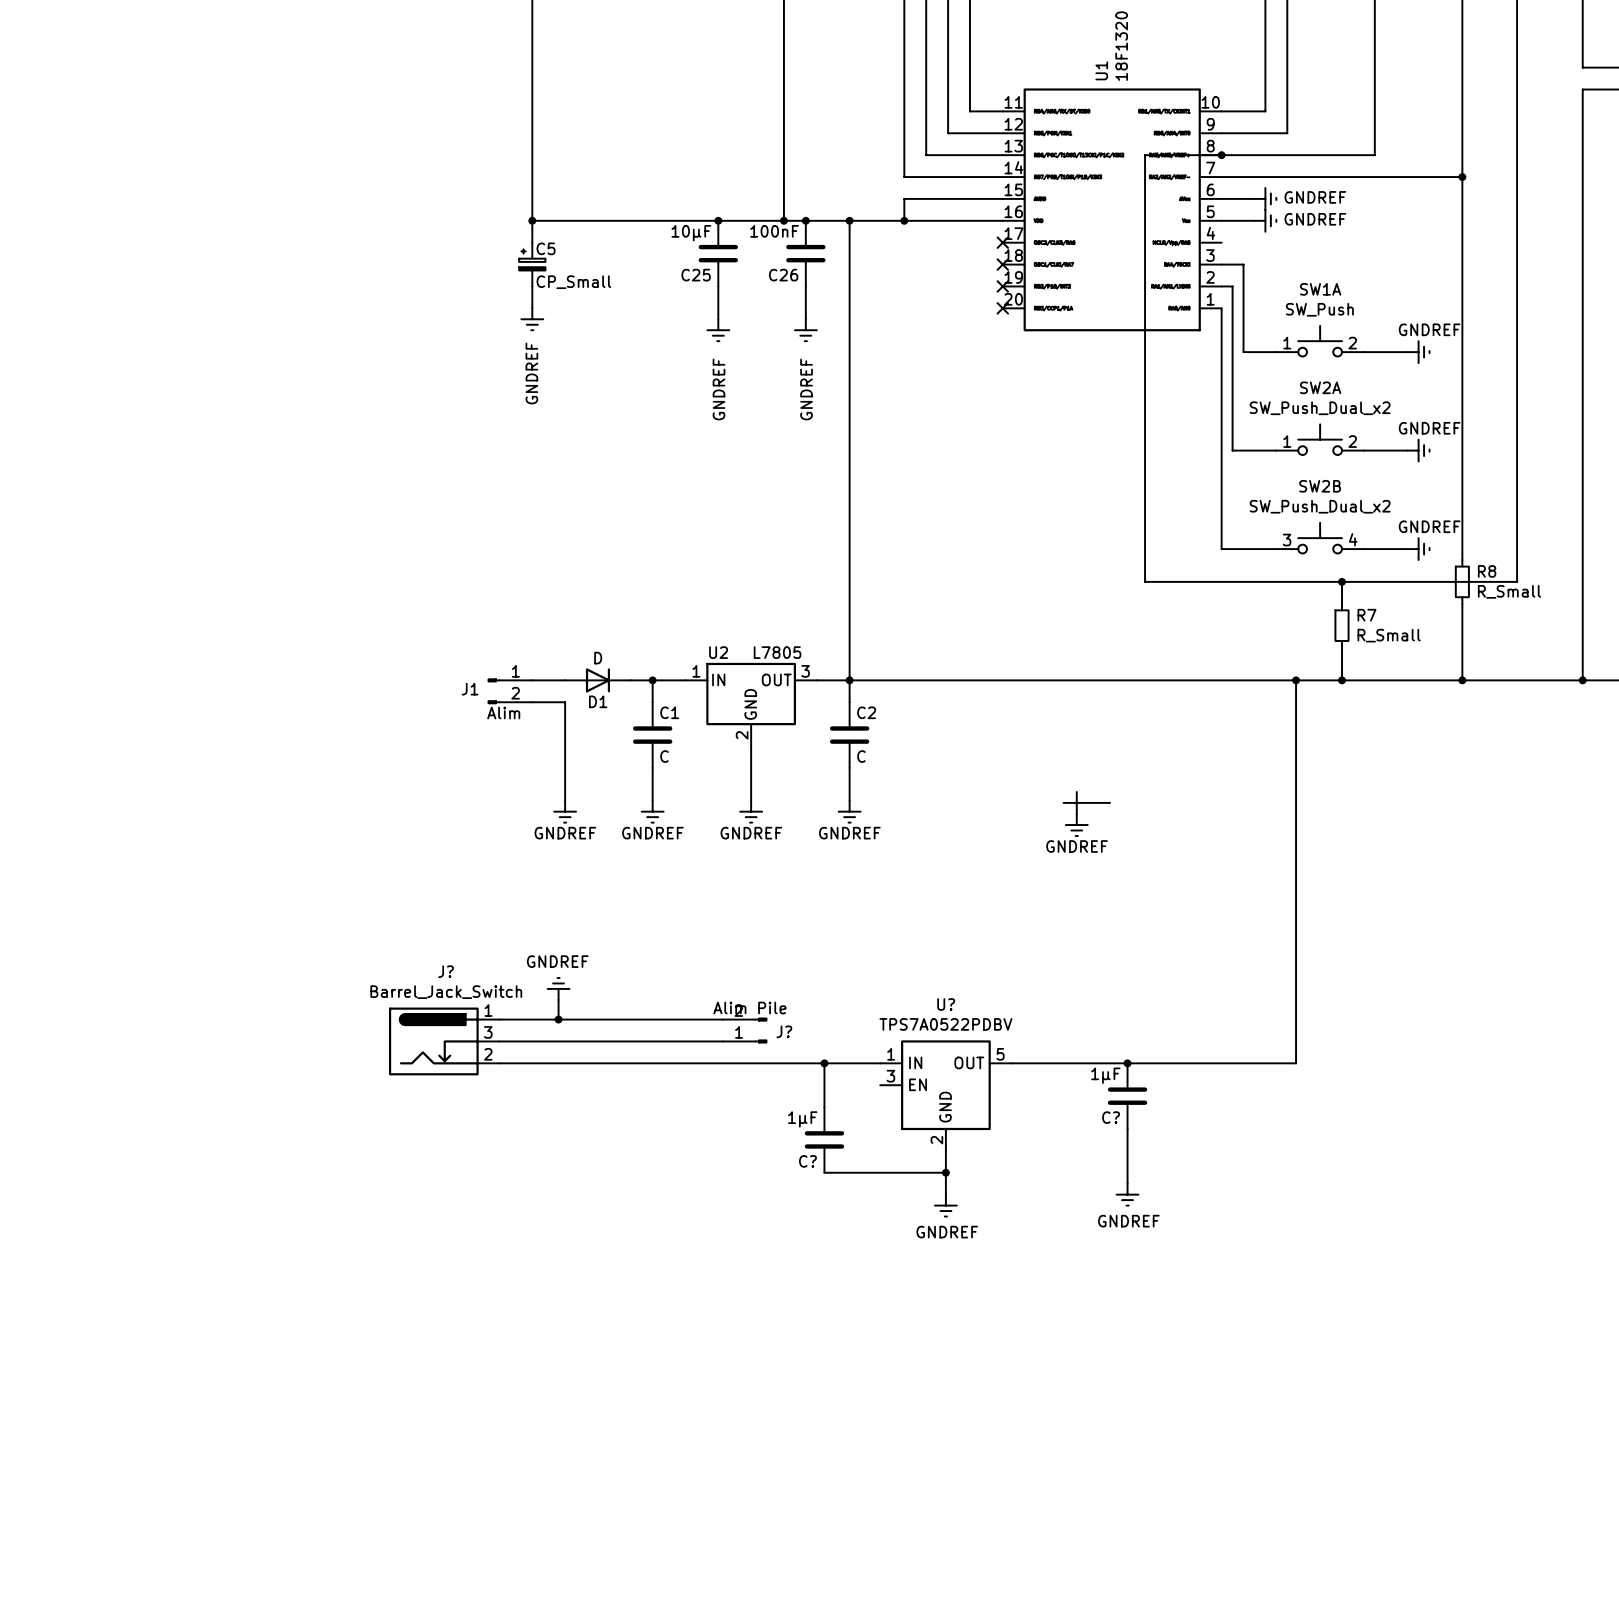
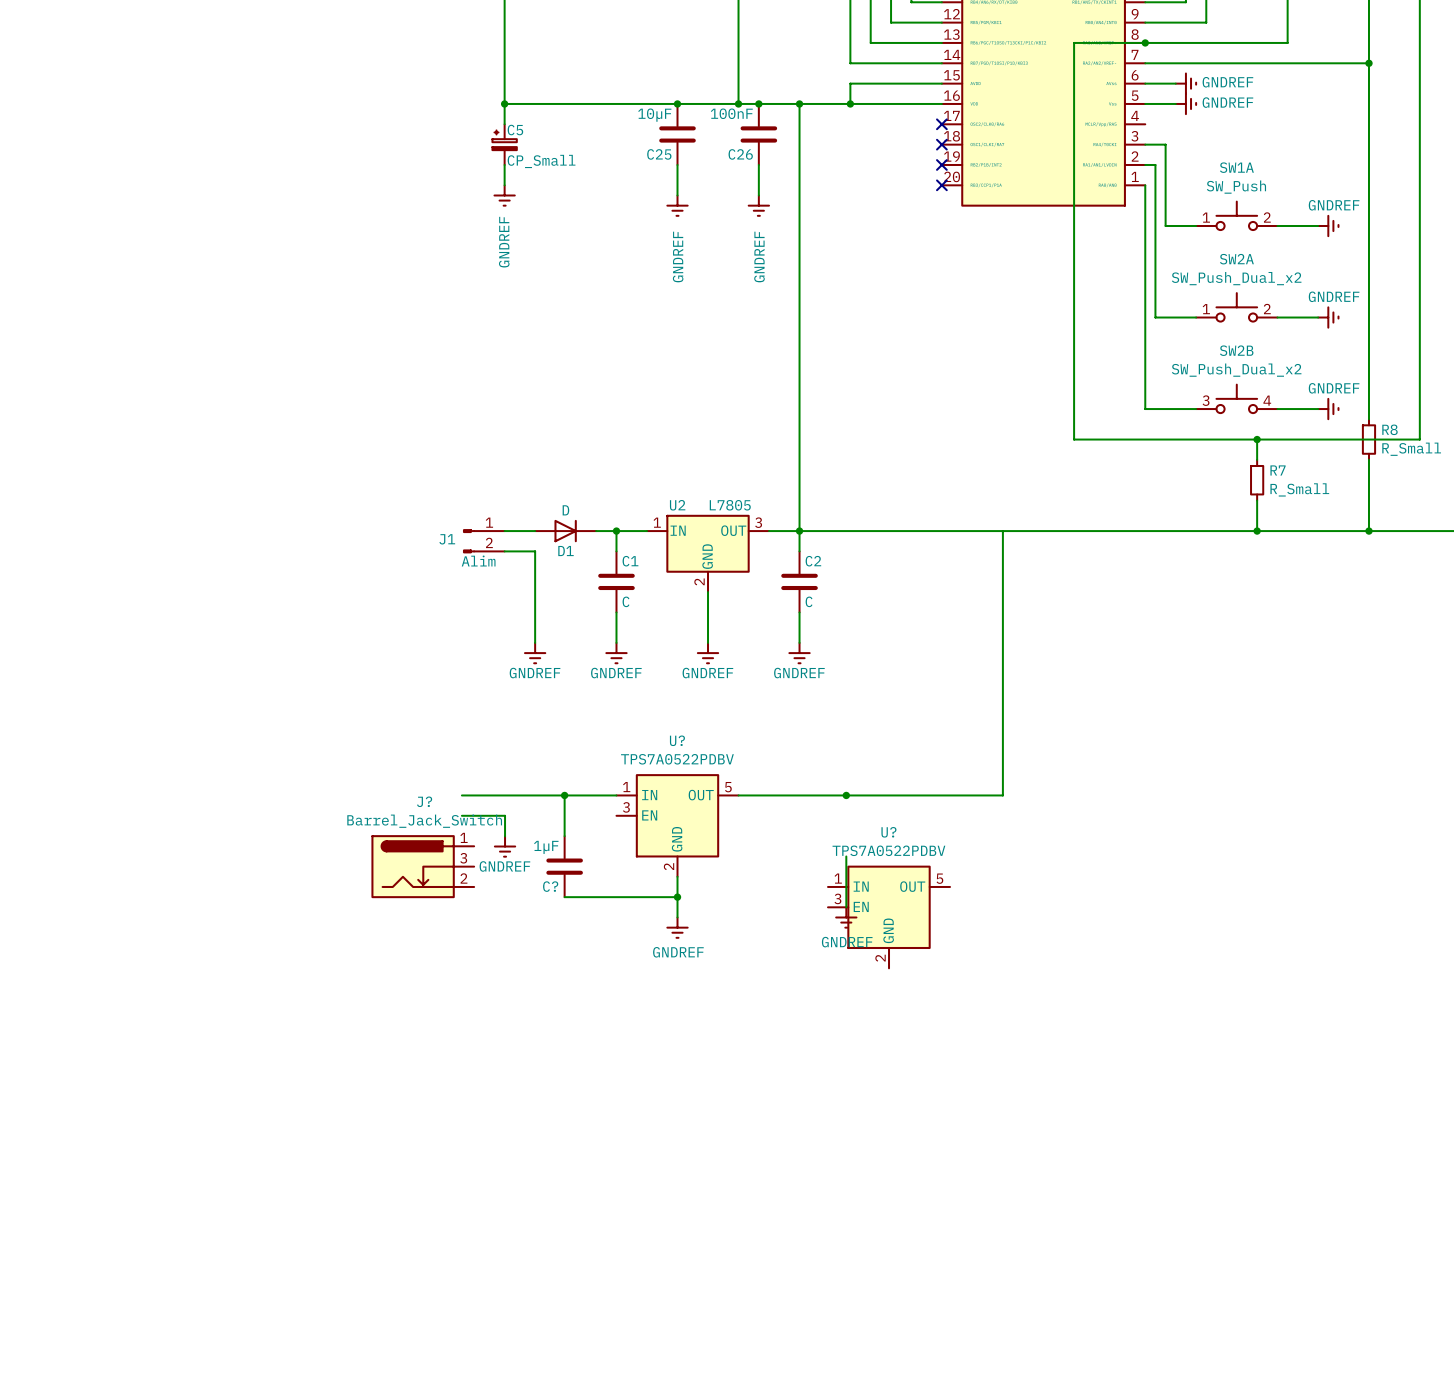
wire: none -> (1002, 531) (1002, 795) (738, 795)
wire: (1296, 680) (1296, 1063) (1011, 1063) -> none
junction: (1296, 680) -> none
wire: (1076, 791) (1076, 814) -> none
wire: (1063, 802) (1110, 802) -> none
power symbol: GNDREF (1076, 825) -> none
wire: none -> (461, 795) (616, 795)
wire: none -> (564, 795) (564, 836)
junction: none -> (564, 795)
junction: none -> (846, 795)
wire: none -> (461, 815) (505, 815) (505, 836)
power symbol rotation: 0° (558, 988) -> 180° (505, 846)
power symbol position: GNDREF (558, 988) -> GNDREF (505, 846)
U?: none -> TPS7A0522PDBV (677, 825)
wire: (558, 999) (558, 1019) -> none
wire: (499, 1019) (722, 1019) -> none
junction: (558, 1019) -> none
J?: Alim Pile (744, 1030) -> none
wire: none -> (846, 856) (846, 907)
wire: (499, 1041) (722, 1041) -> none
C?: none -> 1µF (564, 866)
wire: (499, 1063) (880, 1063) -> none
wire: (824, 1063) (824, 1107) -> (677, 876) (677, 917)
junction: (824, 1063) -> none
junction: (1127, 1063) -> none
wire: none -> (564, 897) (677, 897)
junction: none -> (677, 897)
C?: 1µF (1127, 1096) -> none
power symbol: none -> GNDREF (677, 927)
wire: (1127, 1128) (1127, 1183) -> none
C?: 1µF (824, 1139) -> none
wire: (945, 1150) (945, 1194) -> none
wire: (824, 1172) (945, 1172) -> none
junction: (945, 1172) -> none
power symbol: GNDREF (1127, 1194) -> none
power symbol position: GNDREF (945, 1205) -> GNDREF (846, 917)

